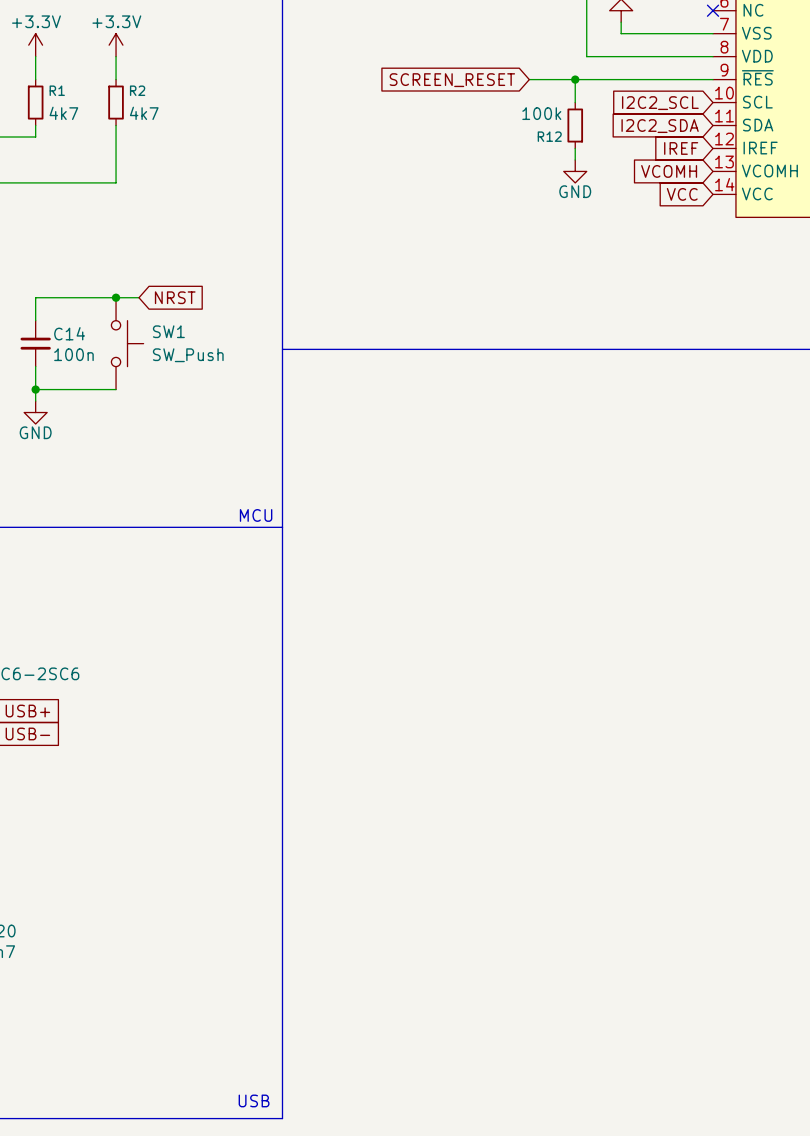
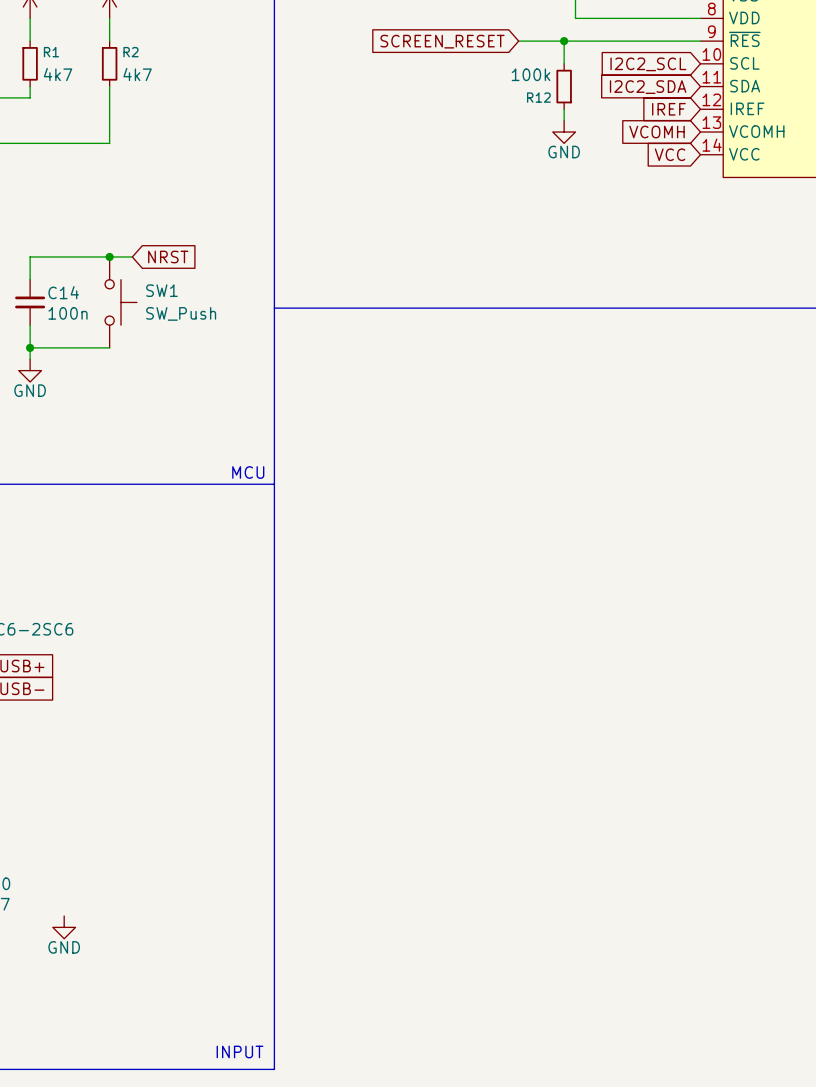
power symbol: none -> GND (64, 927)
text: USB (254, 1100) -> INPUT (239, 1051)

